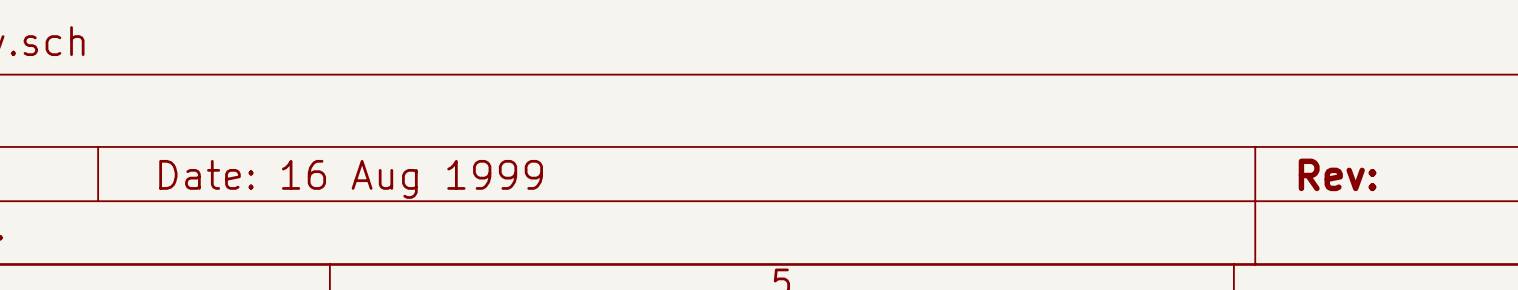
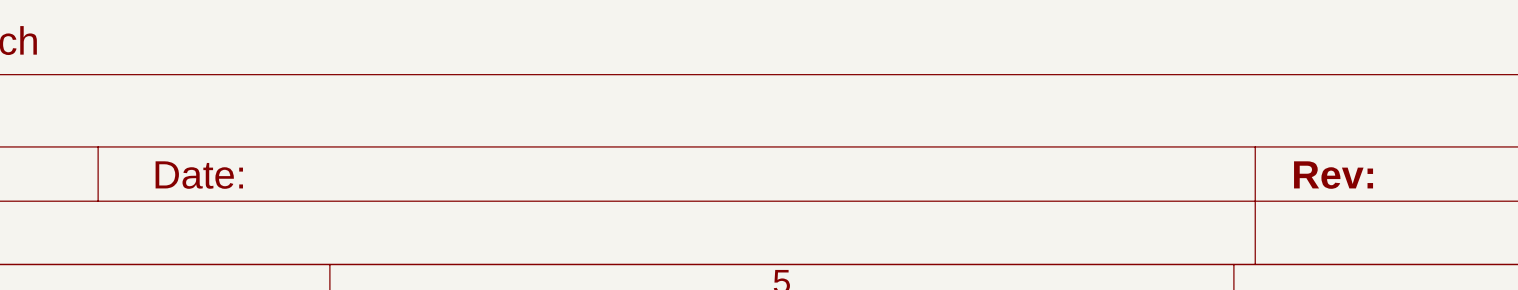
title block: Date: 16 Aug 1999 (351, 179) -> Date: (199, 175)

